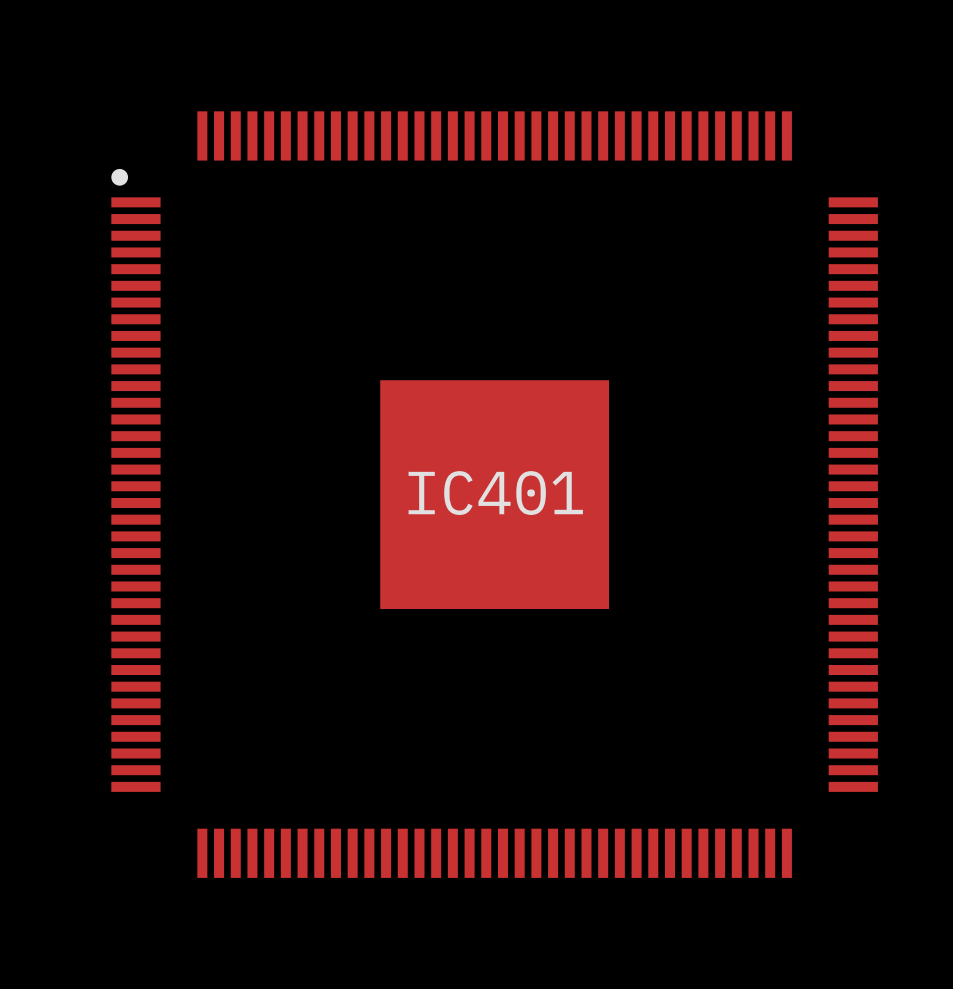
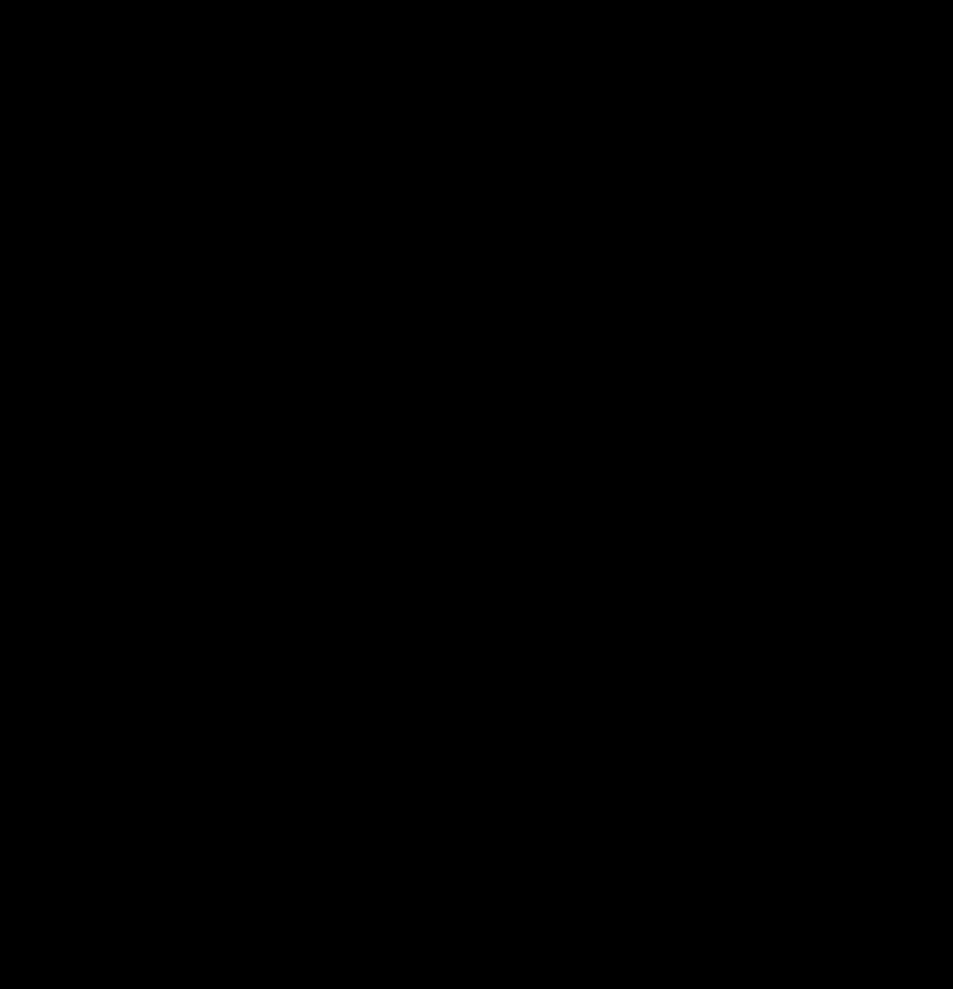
IC401: (494, 494) -> none

